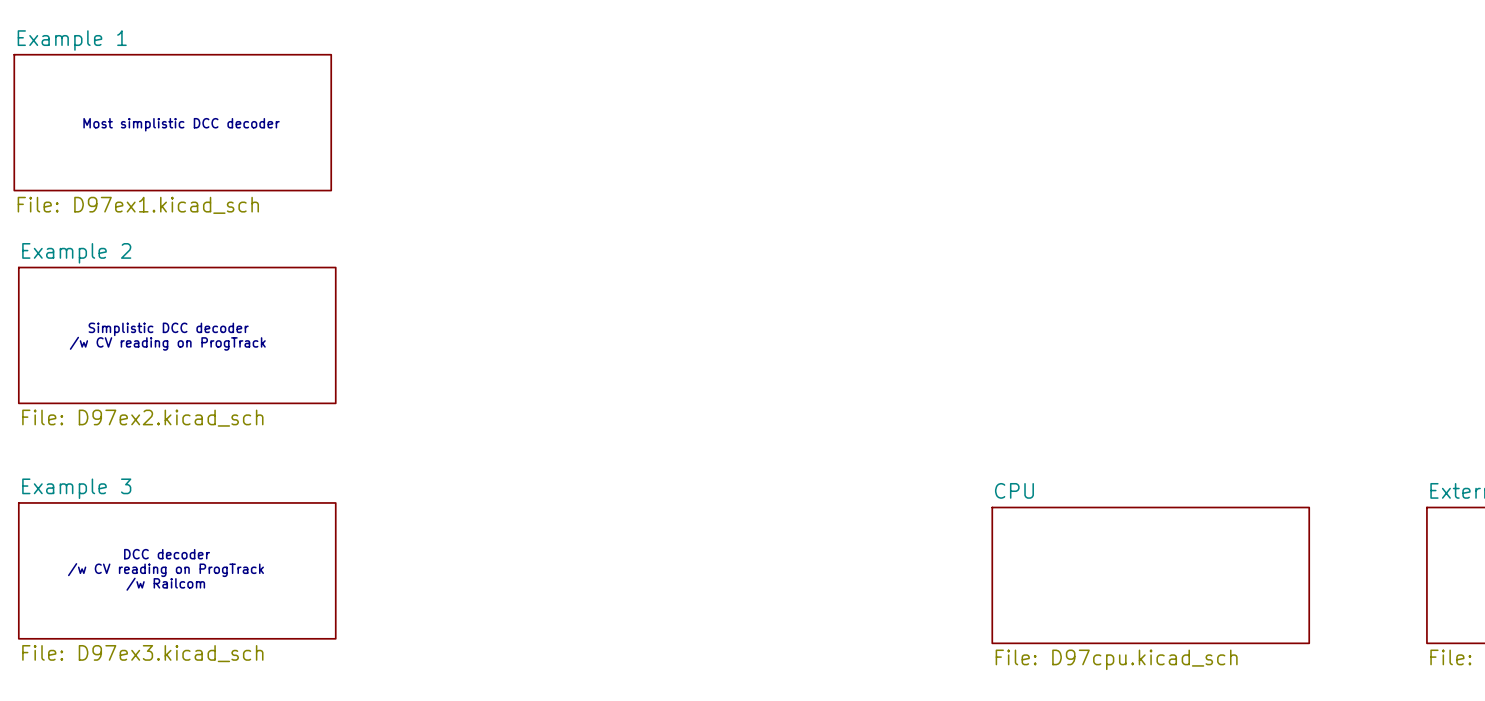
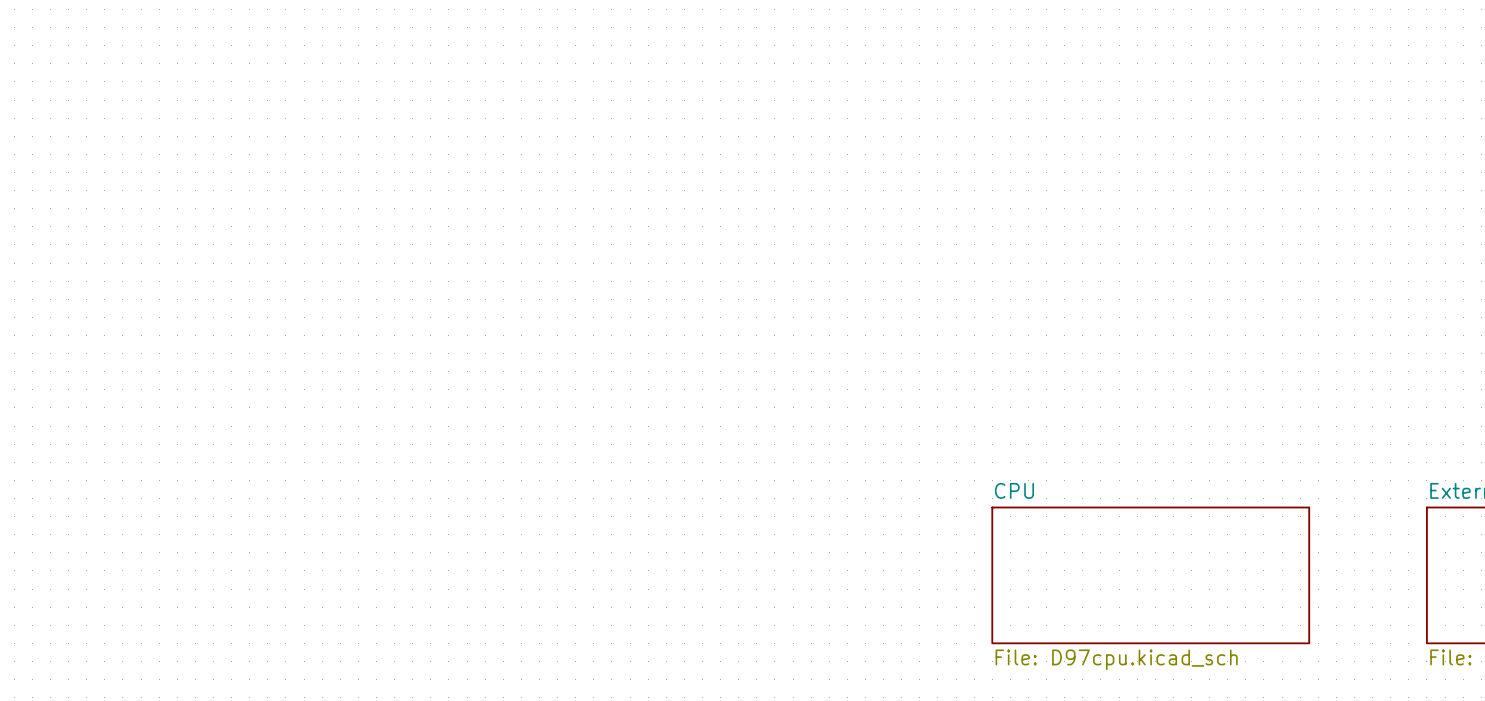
sheet Example 1: File: D97ex1.kicad_sch (172, 122) -> none
text: Most simplistic DCC decoder (181, 124) -> none
text: Simplistic DCC decoder (168, 329) -> none
sheet Example 2: File: D97ex2.kicad_sch (177, 335) -> none
text: /w CV reading on ProgTrack (167, 343) -> none
text: DCC decoder (167, 554) -> none
text: /w CV reading on ProgTrack (165, 570) -> none
sheet Example 3: File: D97ex3.kicad_sch (177, 570) -> none
text: /w Railcom (165, 584) -> none

